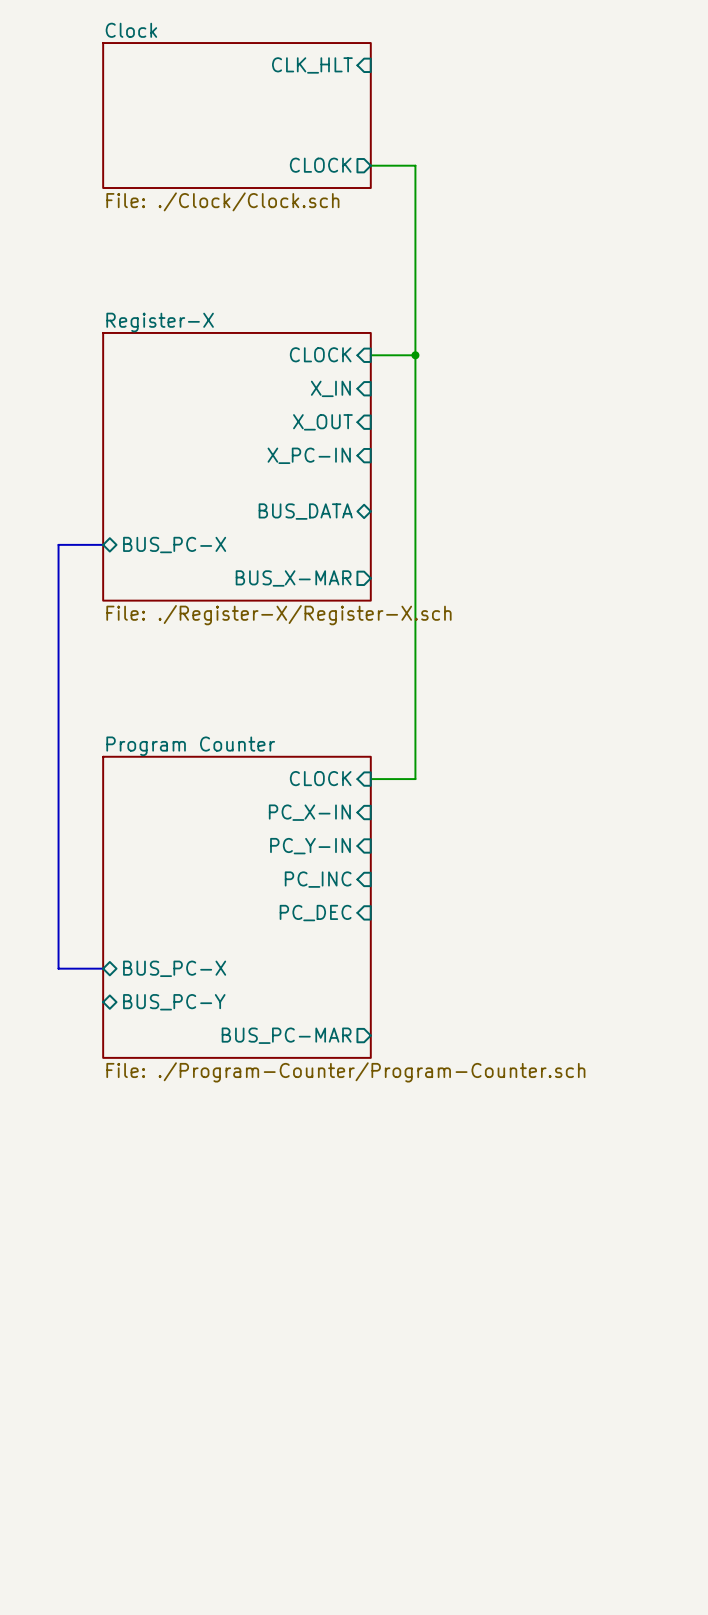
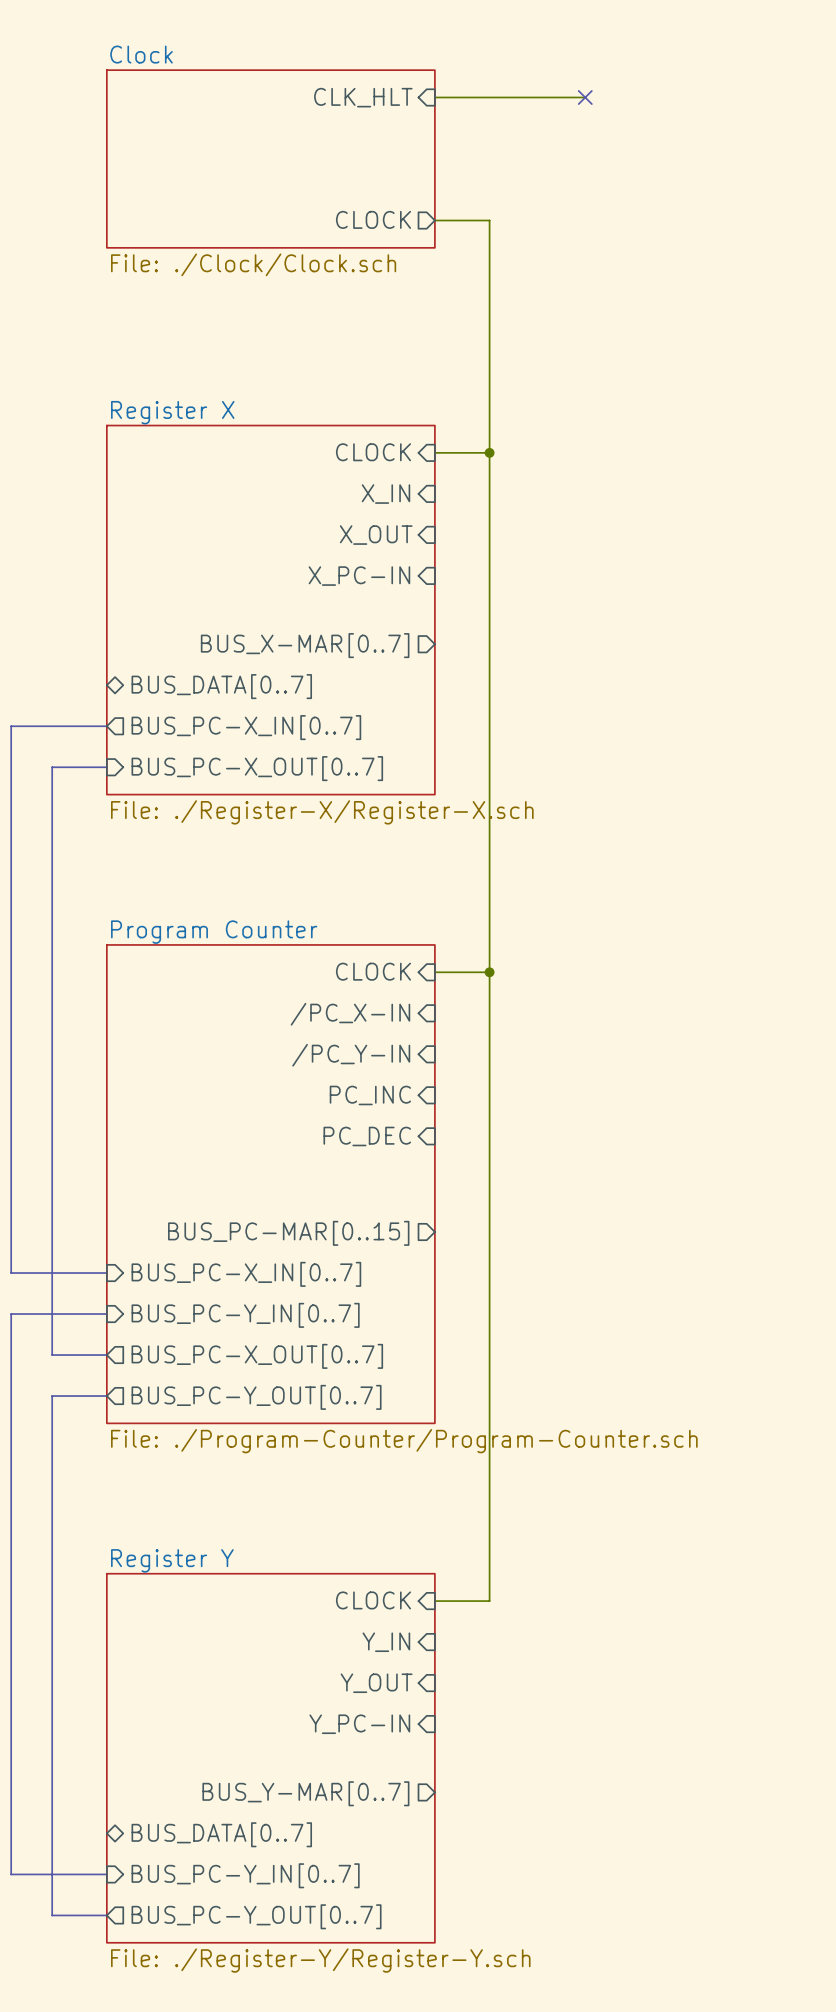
wire: none -> (434, 97) (585, 97)
no-connect mark: none -> (585, 97)
sheet Register-X: File: ./Register-X/Register-X.sch (236, 466) -> none
sheet Register X: none -> File: ./Register-X/Register-X.sch (270, 610)
sheet pin shape: bidirectional (305, 511) -> output (305, 645)
sheet pin: BUS_DATA (305, 511) -> BUS_X-MAR[0..7] (305, 645)
bus: (103, 544) (58, 544) (58, 611) -> (106, 767) (52, 767)
sheet pin: BUS_PC-X (174, 545) -> BUS_DATA[0..7] (221, 686)
bus: none -> (106, 726) (11, 726) (11, 1273) (106, 1273)
sheet pin: BUS_X-MAR (293, 578) -> none
sheet pin: none -> BUS_PC-X_IN[0..7] (246, 727)
sheet pin: none -> BUS_PC-X_OUT[0..7] (257, 768)
wire: none -> (489, 972) (489, 1601) (434, 1601)
junction: none -> (489, 972)
sheet pin: PC_X-IN (309, 812) -> /PC_X-IN (350, 1014)
sheet pin: PC_Y-IN (310, 846) -> /PC_Y-IN (351, 1055)
sheet Program Counter: File: ./Program-Counter/Program-Counter.sch (236, 907) -> none
sheet Program Counter: none -> File: ./Program-Counter/Program-Counter.sch (270, 1184)
bus: (58, 968) (103, 968) -> (52, 1204) (52, 1355) (106, 1355)
sheet pin: BUS_PC-X (174, 968) -> none
sheet pin: none -> BUS_PC-MAR[0..15] (288, 1233)
sheet pin: BUS_PC-Y (174, 1002) -> none
sheet pin: none -> BUS_PC-X_IN[0..7] (246, 1274)
sheet pin: BUS_PC-MAR (286, 1035) -> none
bus: none -> (106, 1314) (11, 1314) (11, 1874) (106, 1874)
sheet pin: none -> BUS_PC-Y_IN[0..7] (245, 1315)
sheet pin: none -> BUS_PC-X_OUT[0..7] (257, 1356)
bus: none -> (106, 1396) (52, 1396) (52, 1915) (106, 1915)
sheet pin: none -> BUS_PC-Y_OUT[0..7] (256, 1397)
sheet pin: none -> CLOCK (373, 1600)
sheet pin: none -> Y_IN (386, 1642)
sheet pin: none -> Y_OUT (376, 1683)
sheet pin: none -> Y_PC-IN (359, 1724)
sheet Register Y: none -> File: ./Register-Y/Register-Y.sch (270, 1758)
sheet pin: none -> BUS_Y-MAR[0..7] (305, 1793)
sheet pin: none -> BUS_DATA[0..7] (221, 1834)
sheet pin: none -> BUS_PC-Y_IN[0..7] (245, 1875)
sheet pin: none -> BUS_PC-Y_OUT[0..7] (256, 1916)

